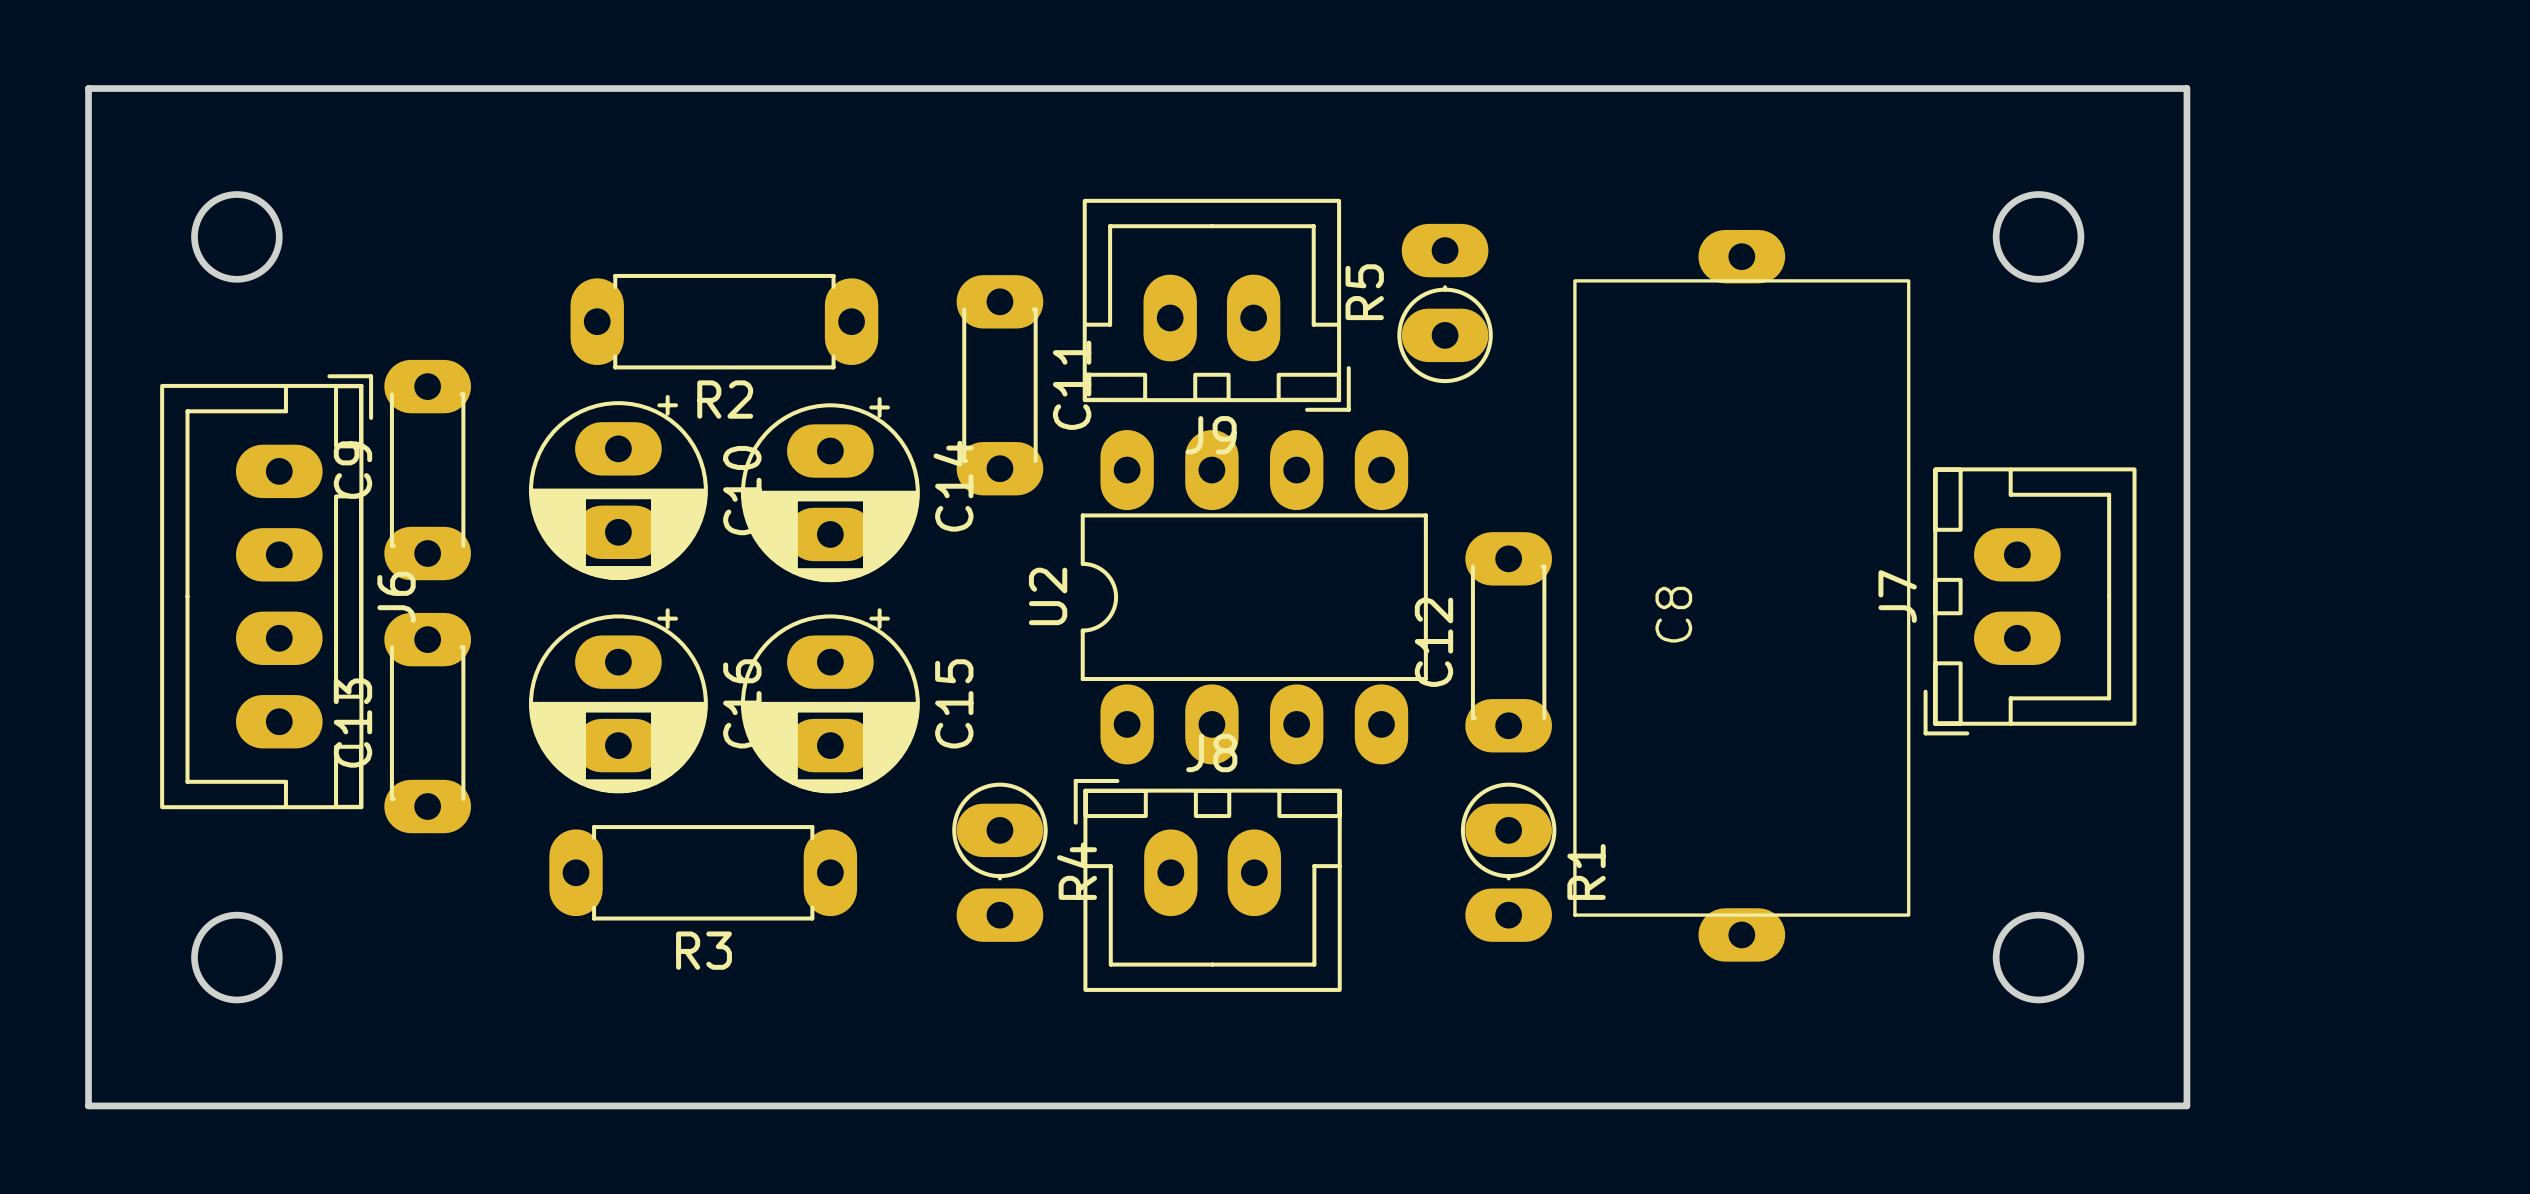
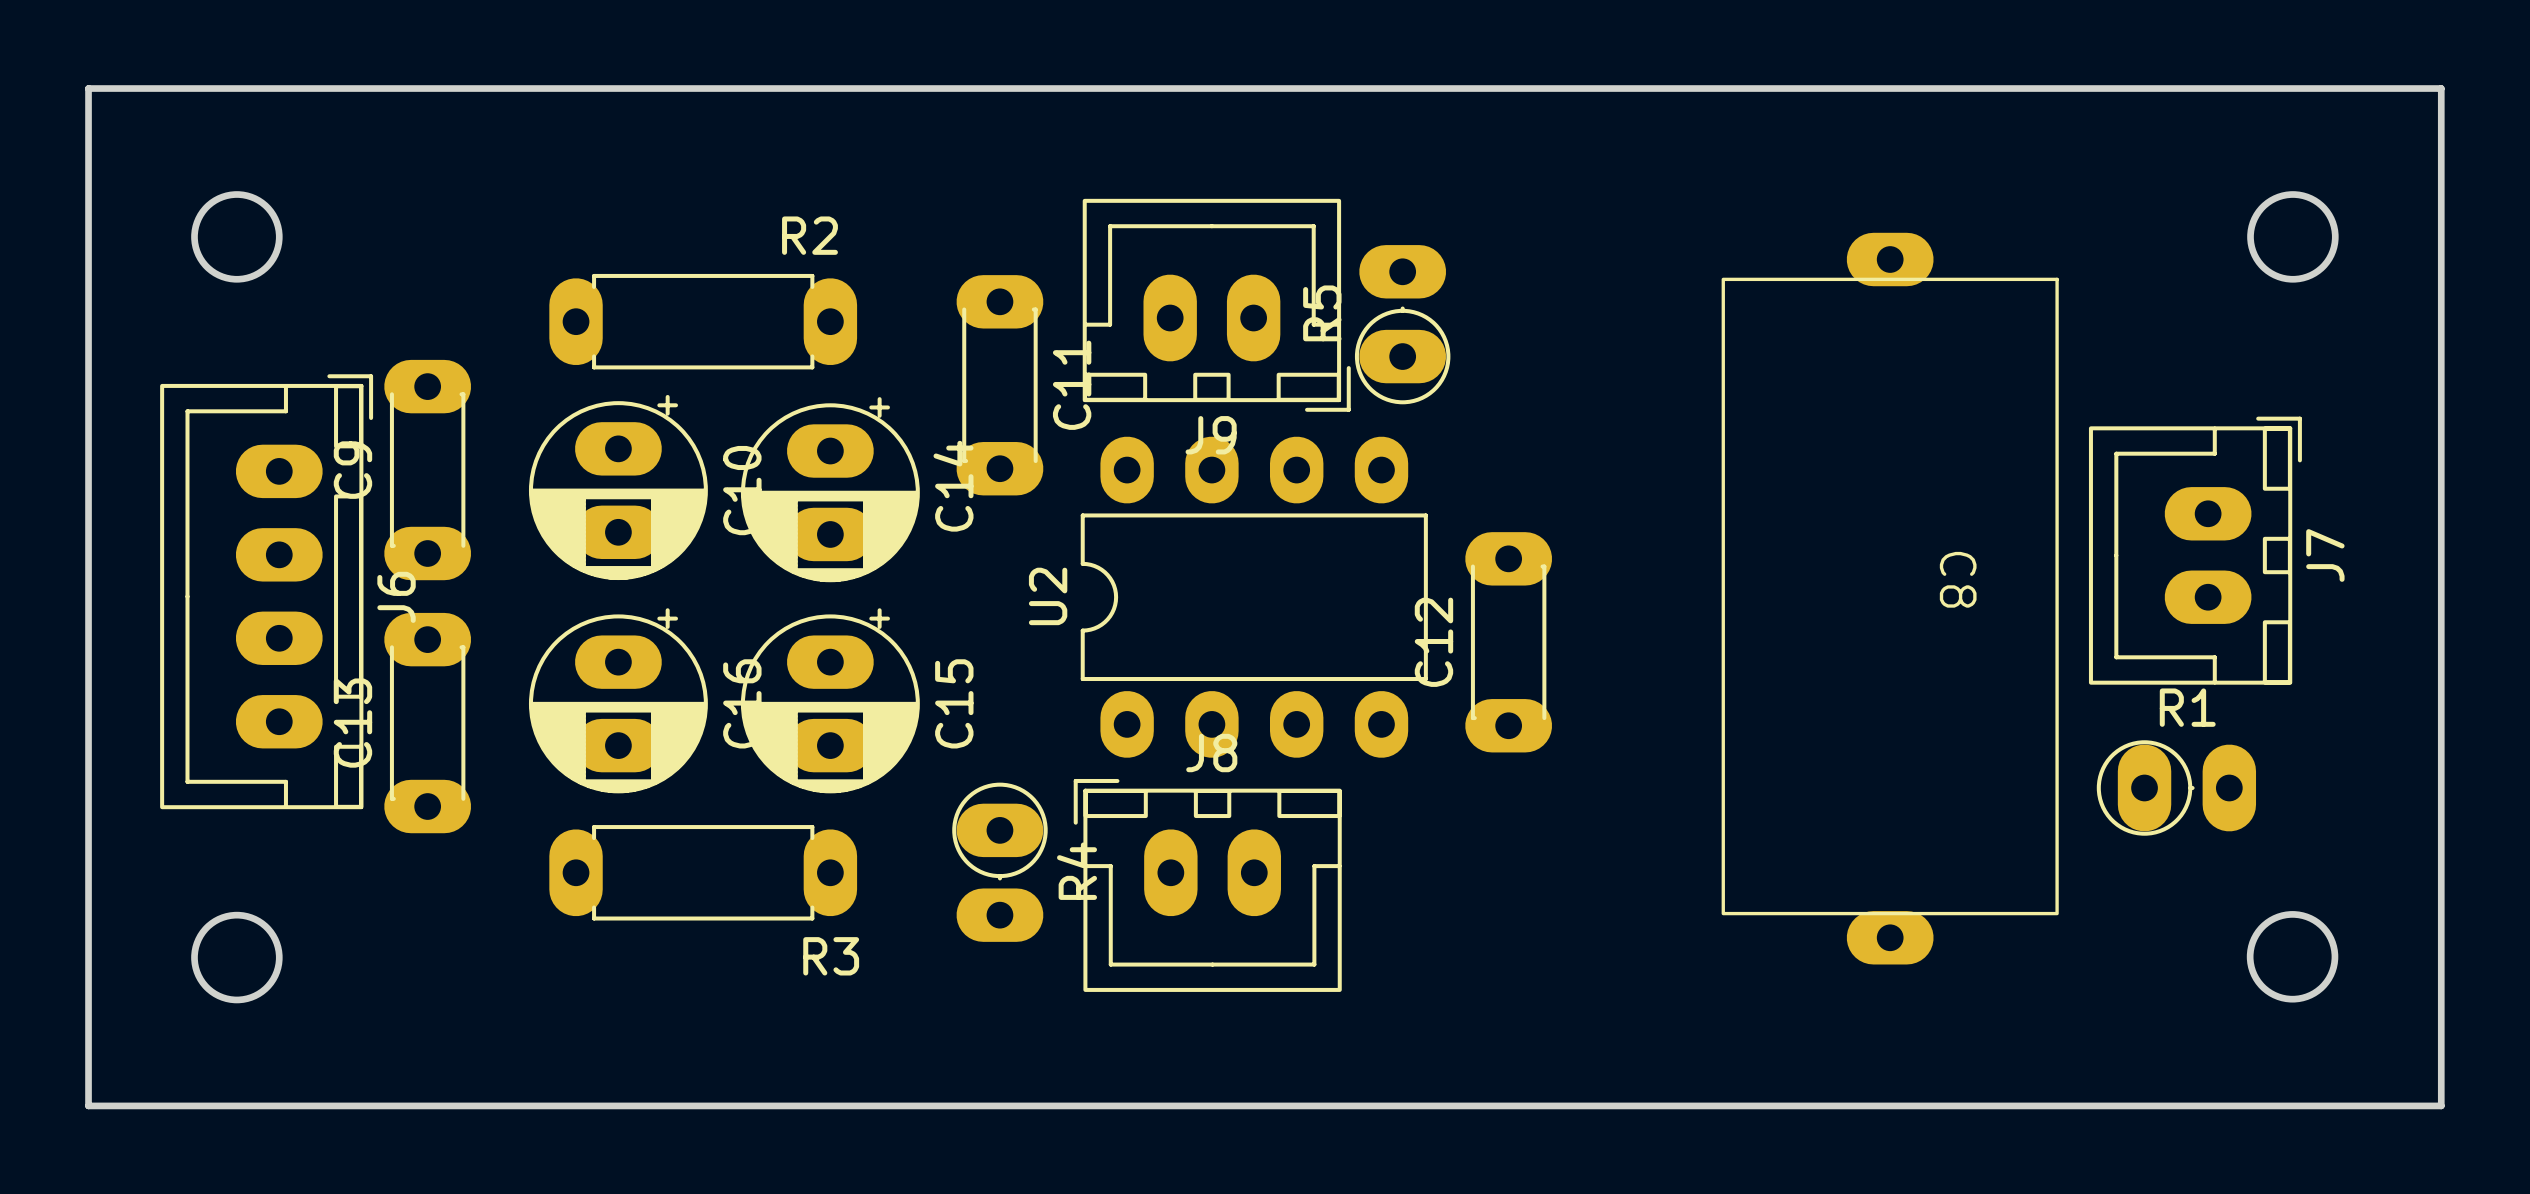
board edge: (2186, 88) (2186, 1105) -> (2186, 88) (2441, 88) (2441, 1105) (2186, 1105)
round board edge position: (2038, 236) -> (2292, 236)
R5 position: (1445, 303) -> (1402, 324)
R2 position: (724, 321) -> (703, 321)
R2 name position: R2 (725, 399) -> R2 (809, 235)
U2 footprint: [1080, 429, 1428, 765] -> [1080, 436, 1428, 758]
C8 rotation: 0° (1741, 595) -> 180° (1890, 598)
J7 rotation: 0° (2030, 601) -> 180° (2195, 550)
J7 position: (2030, 601) -> (2195, 550)
R1 rotation: 0° (1508, 862) -> 90° counterclockwise (2176, 787)
R1 position: (1508, 862) -> (2176, 787)
R3 name position: R3 (704, 950) -> R3 (831, 956)
round board edge position: (2038, 957) -> (2292, 956)

